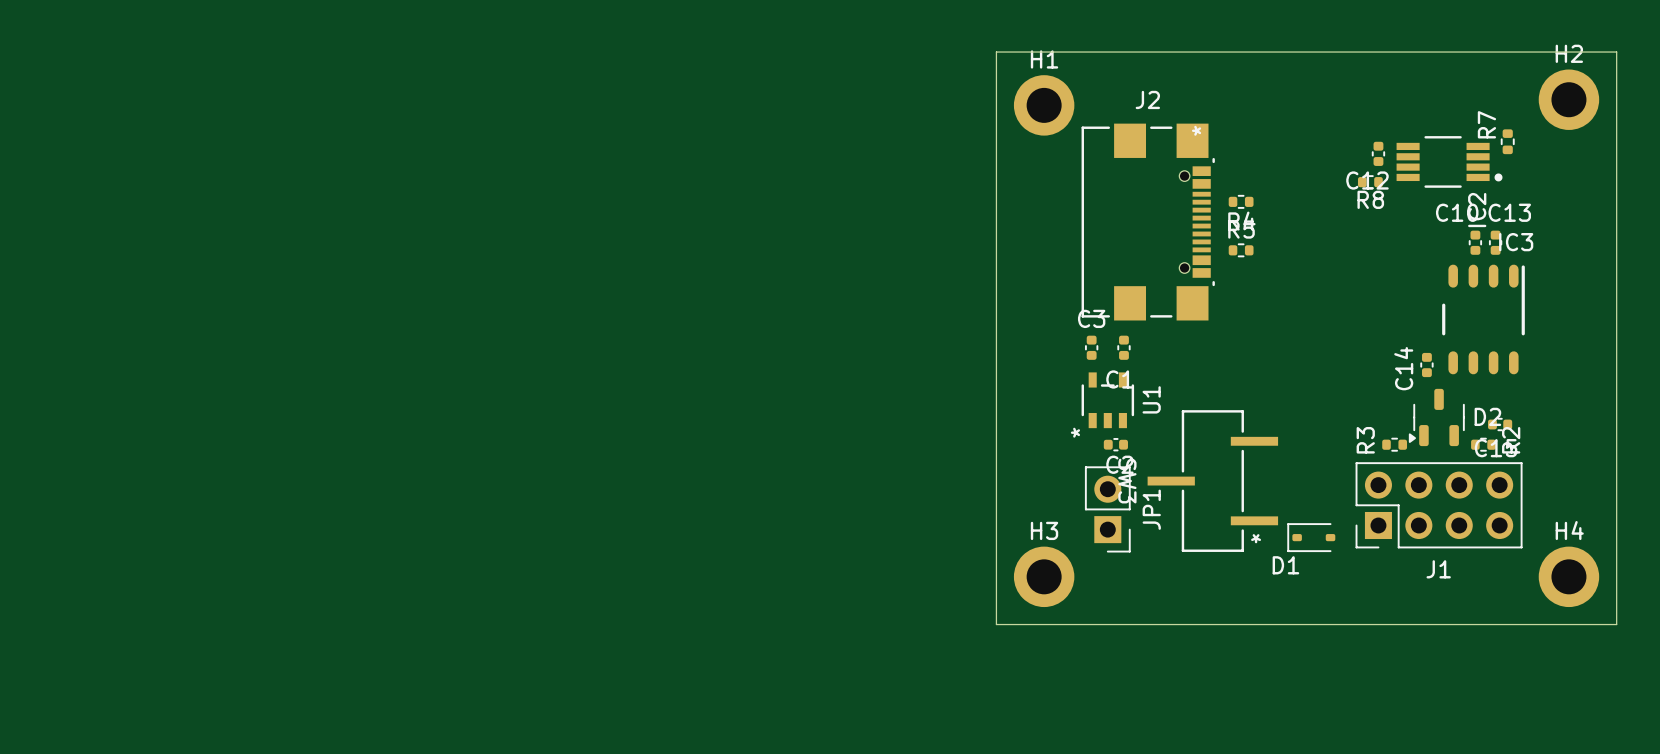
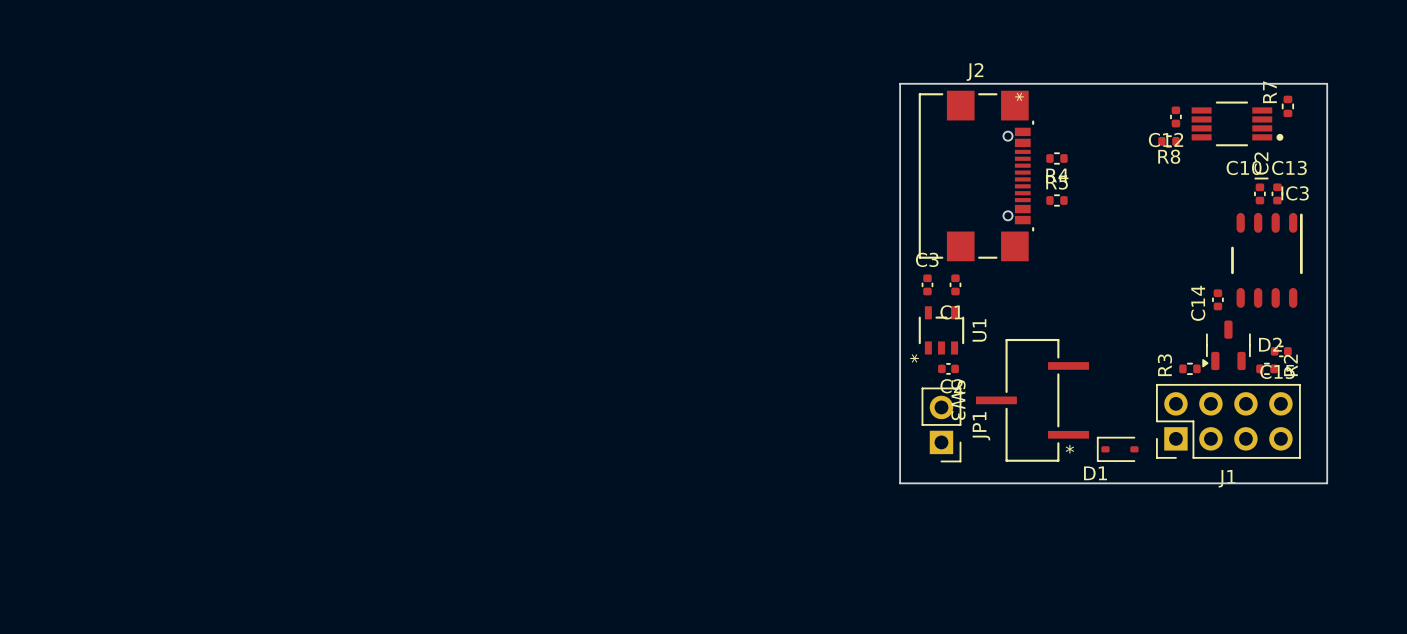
board edge: (996, 52) (1616, 52) (1616, 624) (996, 624) (996, 52) -> (900, 83) (900, 483) (1327, 483) (1327, 83) (900, 83)
H2: (1568, 99) -> none
H1: (1044, 105) -> none
H3: (1044, 576) -> none
H4: (1568, 576) -> none

